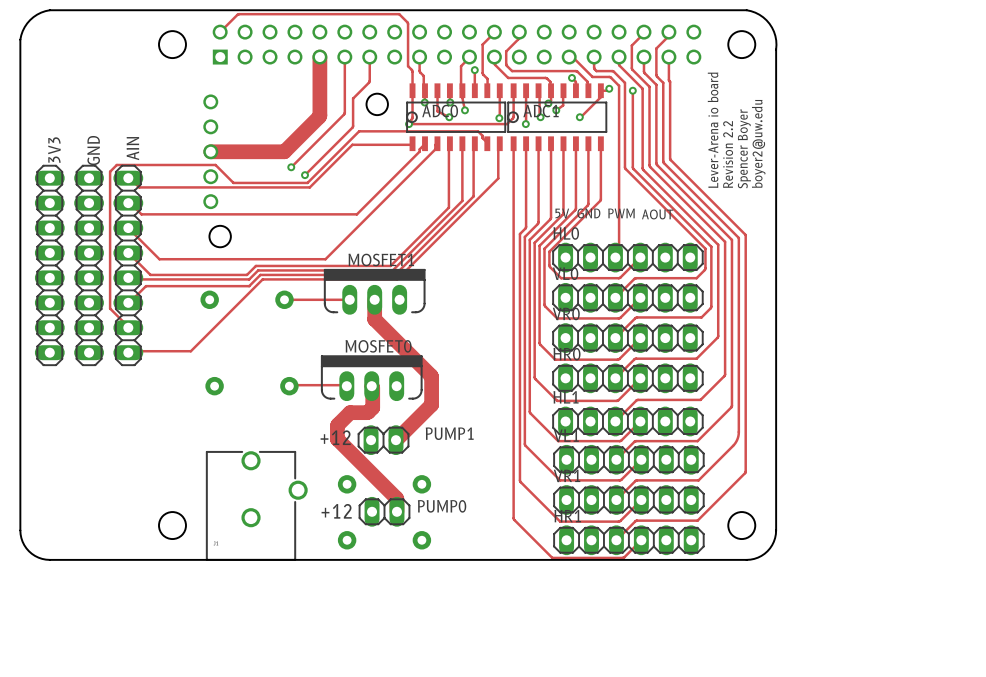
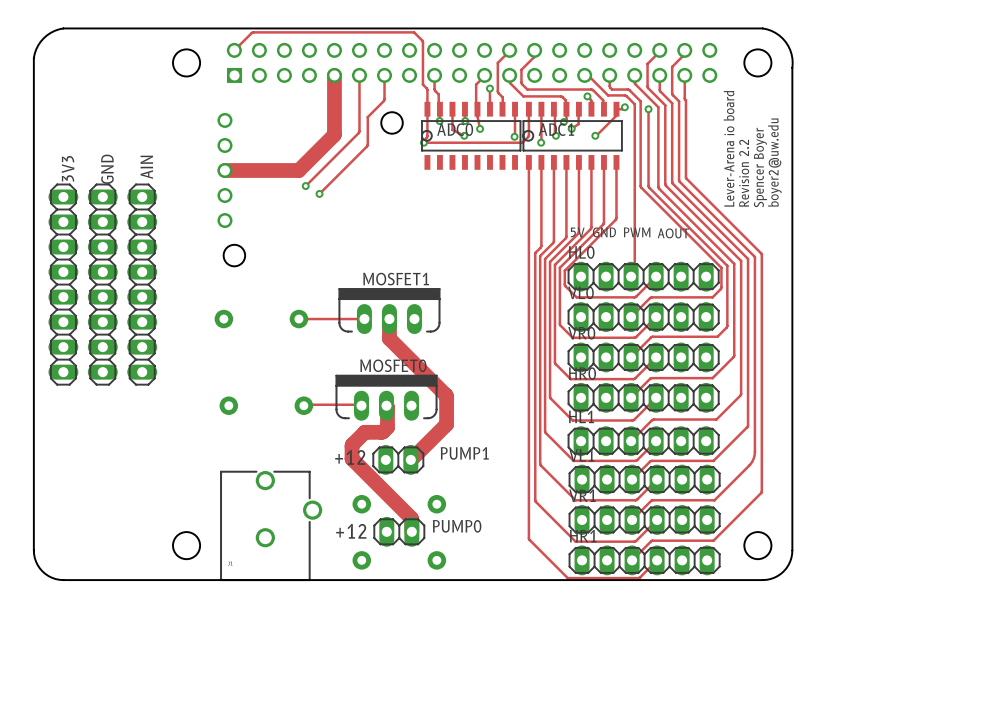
track: (412, 143) (352, 144) (309, 187) (139, 187) (128, 178) -> none
track: (424, 143) (419, 151) (356, 214) (141, 214) (128, 203) -> none
track: (437, 143) (435, 144) (435, 149) (325, 259) (159, 259) (128, 228) -> none
track: (449, 143) (448, 207) (390, 265) (255, 265) (246, 274) (150, 274) (128, 252) -> none
track: (462, 143) (462, 200) (392, 270) (258, 270) (249, 279) (128, 277) -> none
track: (474, 143) (473, 196) (395, 274) (260, 274) (249, 286) (146, 286) (128, 302) -> none
track: (487, 143) (478, 131) (359, 131) (307, 182) (233, 182) (215, 164) (116, 164) (110, 171) (110, 308) (128, 327) -> none
track: (499, 143) (498, 178) (397, 279) (262, 279) (190, 351) (128, 352) -> none

